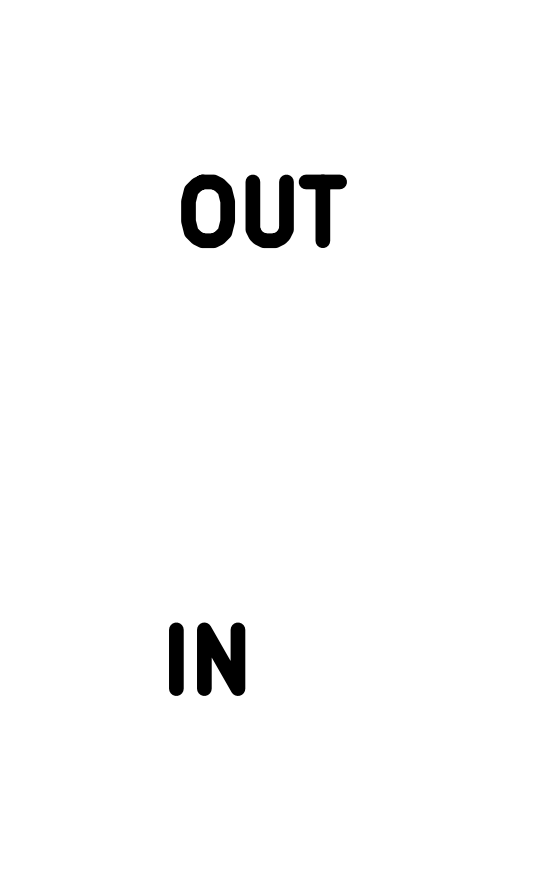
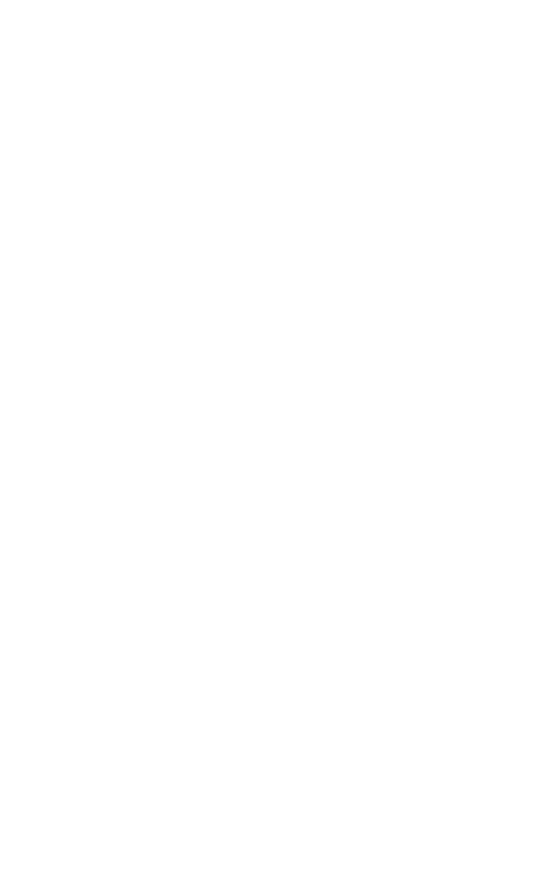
text: OUT (264, 211) -> none
text: IN (207, 659) -> none

